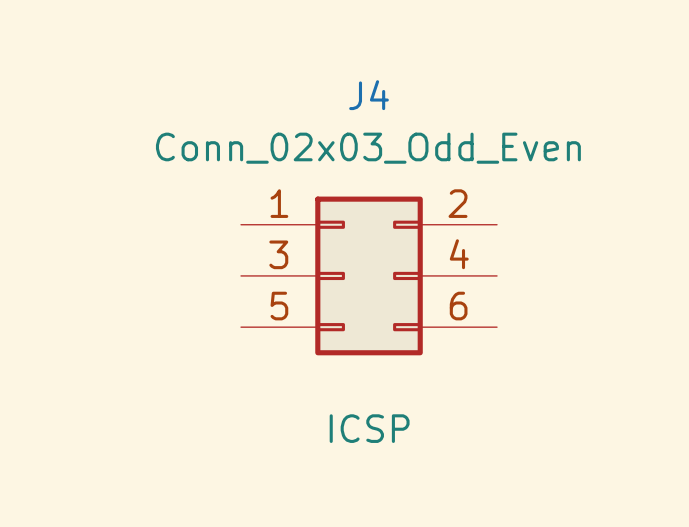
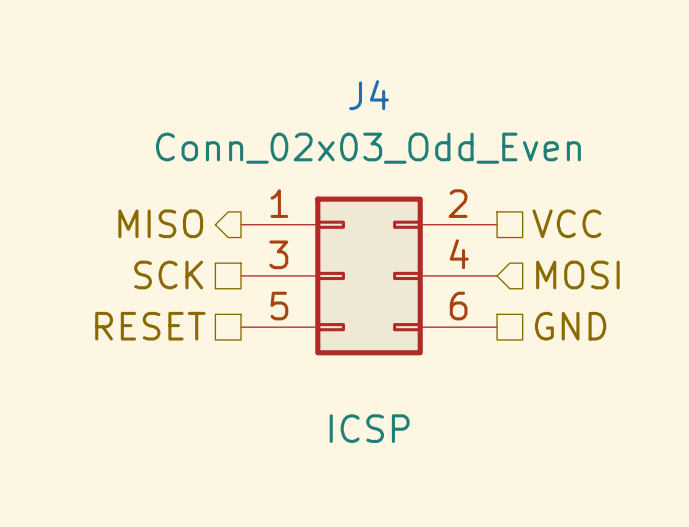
hierarchical label: none -> MISO (160, 223)
hierarchical label: none -> VCC (566, 223)
hierarchical label: none -> SCK (168, 274)
hierarchical label: none -> MOSI (577, 274)
hierarchical label: none -> RESET (150, 326)
hierarchical label: none -> GND (570, 326)

